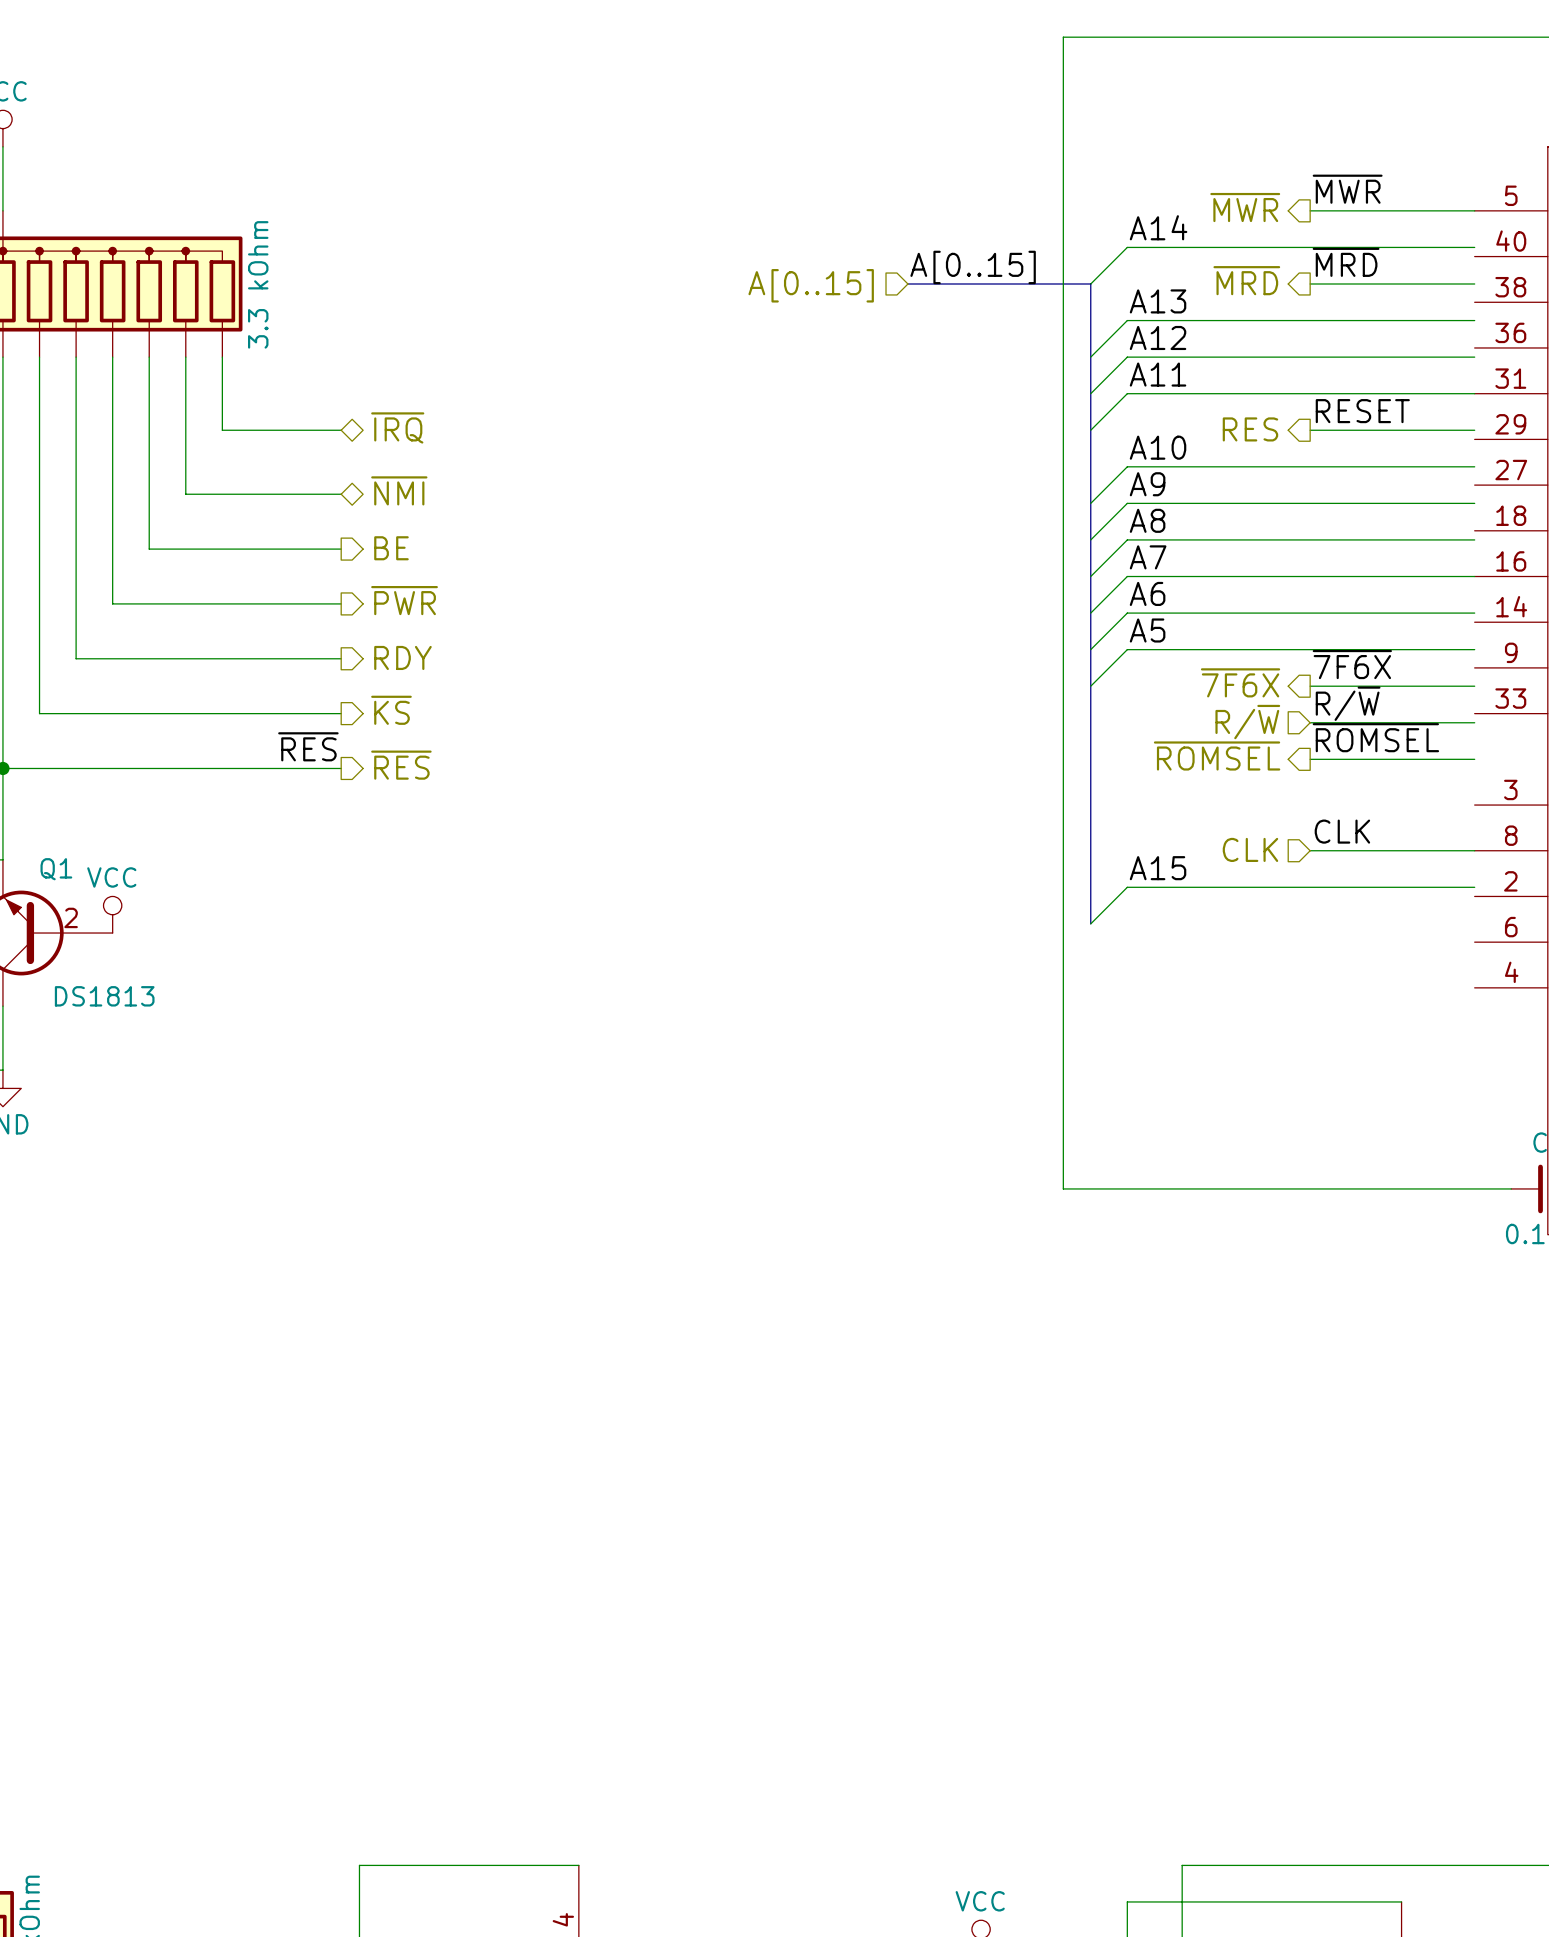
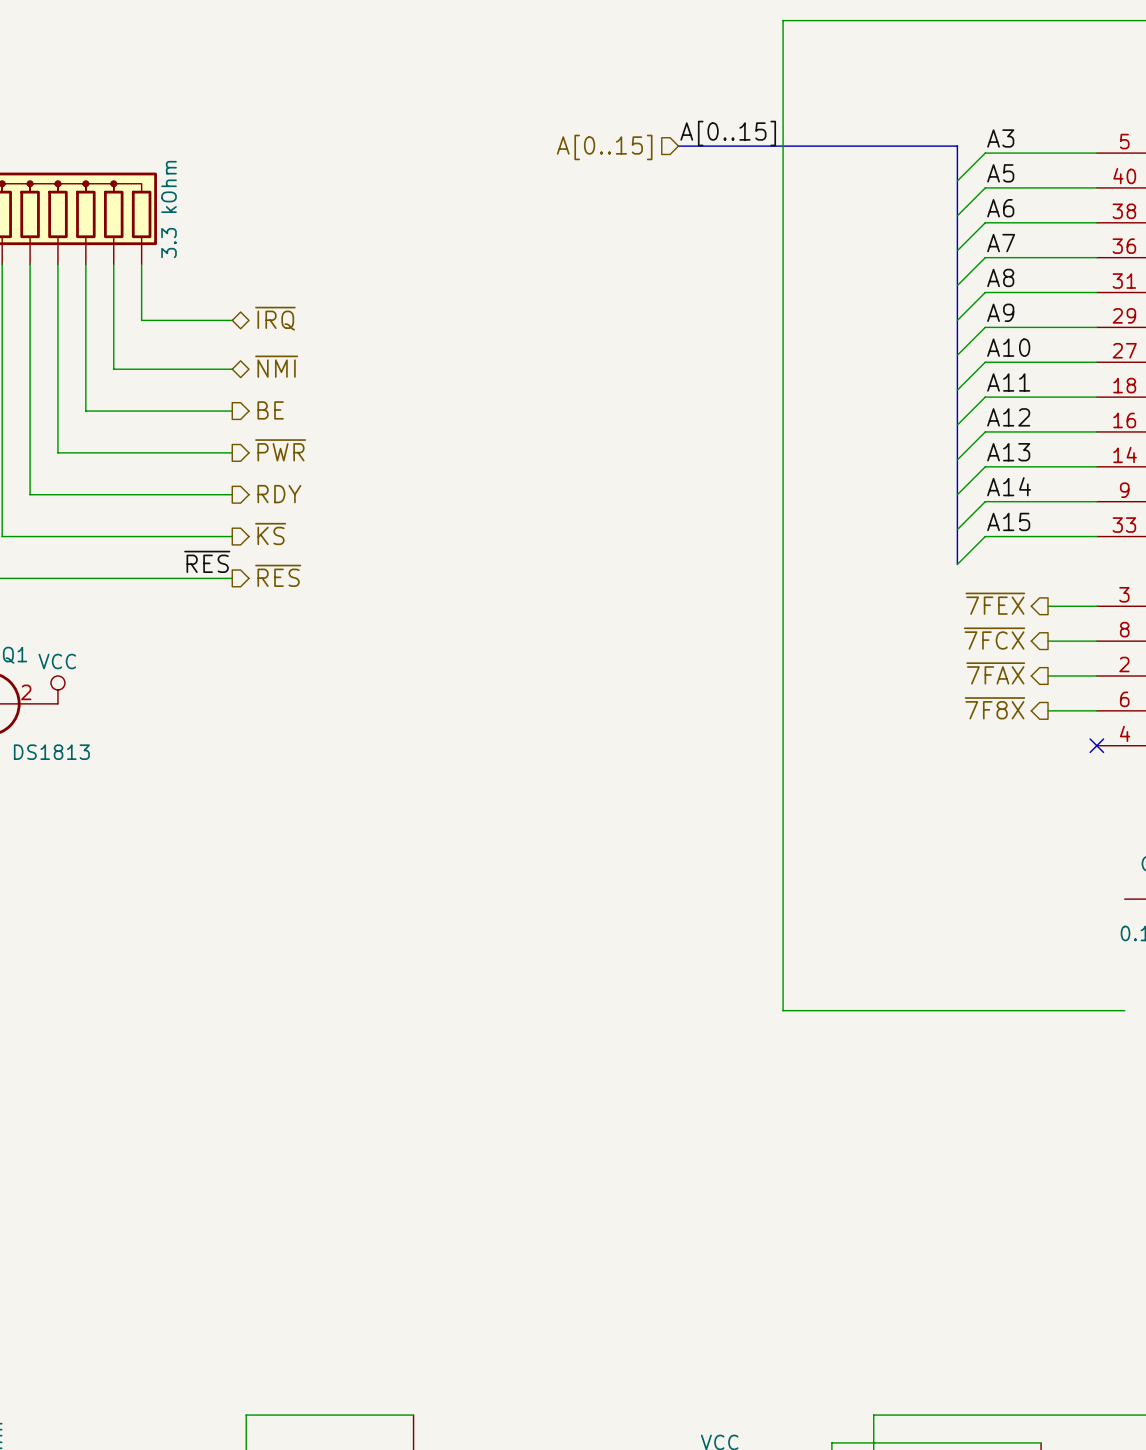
label: ~{MWR} (1347, 189) -> none
label: none -> A3 (1000, 138)
bus: none -> (678, 146) (957, 146) (957, 564)
hierarchical label: ~{MWR} (1245, 207) -> none
wire: (1310, 210) (1328, 210) -> (957, 180) (985, 153)
label: A14 (1158, 227) -> none
label: none -> A5 (1000, 173)
wire: (1474, 247) (1127, 247) (1090, 283) -> none
wire: none -> (1096, 187) (985, 187) (957, 215)
label: ~{MRD} (1346, 262) -> none
label position: A[0..15] (973, 267) -> A[0..15] (728, 133)
hierarchical label: ~{MRD} (1246, 280) -> none
bus: (907, 283) (1090, 283) (1090, 923) -> none
wire: (1310, 283) (1474, 283) -> none
label: none -> A6 (1000, 208)
hierarchical label position: A[0..15] (811, 285) -> A[0..15] (604, 147)
label: A13 (1158, 301) -> none
wire: none -> (1096, 222) (985, 222) (957, 250)
wire: (1474, 320) (1127, 320) (1090, 357) -> none
label position: A12 (1158, 337) -> A12 (1008, 417)
wire: none -> (1096, 257) (985, 257) (957, 285)
wire: (1474, 357) (1127, 357) (1090, 393) -> none
label position: A11 (1158, 374) -> A11 (1008, 382)
wire: (1328, 393) (1127, 393) (1090, 430) -> (985, 292) (957, 320)
label: RESET (1362, 411) -> none
hierarchical label: RES (1250, 429) -> none
wire: (1310, 430) (1474, 430) -> none
wire: none -> (1096, 327) (985, 327) (957, 355)
label position: A10 (1158, 447) -> A10 (1008, 347)
wire: (1474, 466) (1127, 466) (1090, 503) -> none
label position: A9 (1147, 484) -> A9 (1000, 312)
wire: none -> (1096, 362) (985, 362) (957, 390)
wire: (1474, 503) (1127, 503) (1090, 539) -> none
label position: A8 (1147, 520) -> A8 (1000, 277)
wire: none -> (1096, 397) (985, 397) (957, 424)
wire: (1474, 539) (1127, 539) (1090, 576) -> none
label position: A7 (1148, 557) -> A7 (1001, 243)
wire: (1328, 576) (1127, 576) (1090, 613) -> (985, 431) (957, 459)
label: A6 (1147, 593) -> none
label: none -> A13 (1008, 452)
wire: (1474, 613) (1127, 613) (1090, 649) -> none
wire: none -> (1096, 466) (985, 466) (957, 494)
label: A5 (1147, 630) -> none
label: none -> A14 (1009, 486)
wire: (1474, 649) (1127, 649) (1090, 686) -> none
label: ~{7F6X} (1352, 664) -> none
wire: none -> (1096, 501) (985, 501) (957, 529)
hierarchical label: ~{7F6X} (1240, 682) -> none
wire: (1310, 686) (1474, 686) -> none
label: R/~{W} (1348, 703) -> none
wire: none -> (1096, 536) (985, 536) (957, 564)
hierarchical label: R/~{W} (1247, 722) -> none
wire: (1310, 722) (1474, 722) -> none
label: ~{ROMSEL} (1375, 737) -> none
hierarchical label: ~{ROMSEL} (1217, 755) -> none
wire: (1310, 759) (1474, 759) -> none
hierarchical label: none -> ~{7FEX} (995, 603)
wire: none -> (1048, 606) (1096, 606)
label: CLK (1342, 831) -> none
hierarchical label: none -> ~{7FCX} (994, 638)
hierarchical label: CLK (1250, 849) -> none
wire: (1310, 850) (1410, 850) -> none
label position: A15 (1158, 868) -> A15 (1008, 521)
wire: (1474, 887) (1127, 887) (1090, 923) -> none
hierarchical label: none -> ~{7FAX} (995, 673)
wire: none -> (1048, 676) (1096, 676)
hierarchical label: none -> ~{7F8X} (994, 708)
wire: none -> (1048, 710) (1096, 710)
no-connect mark: none -> (1096, 745)
wire: (1063, 1188) (1511, 1188) -> (783, 899) (783, 1010) (1124, 1010)

